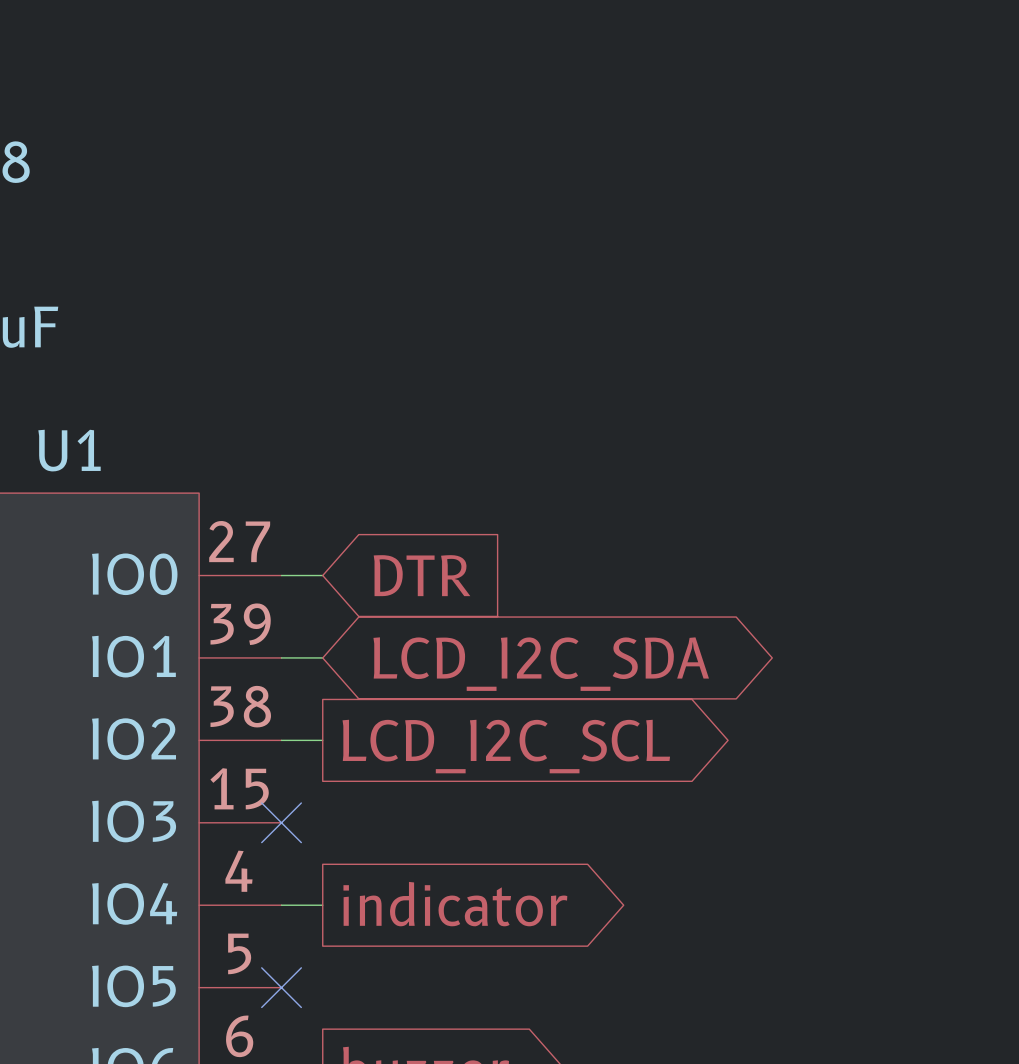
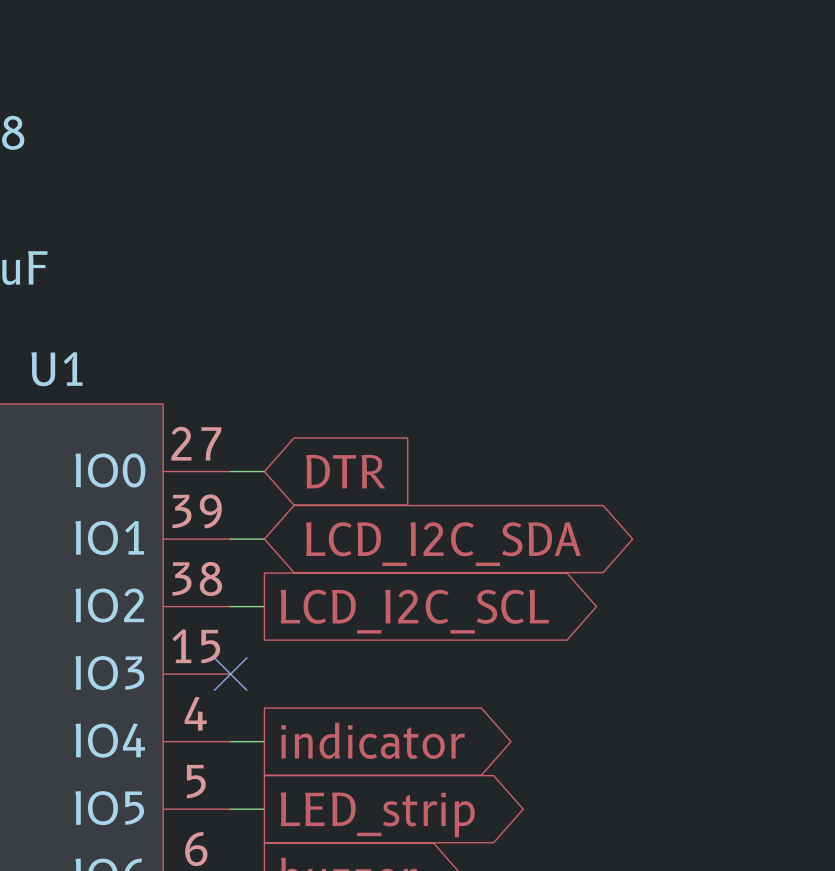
wire: none -> (230, 809) (264, 809)
no-connect mark: (281, 987) -> none
global label: none -> LED_strip (377, 814)

